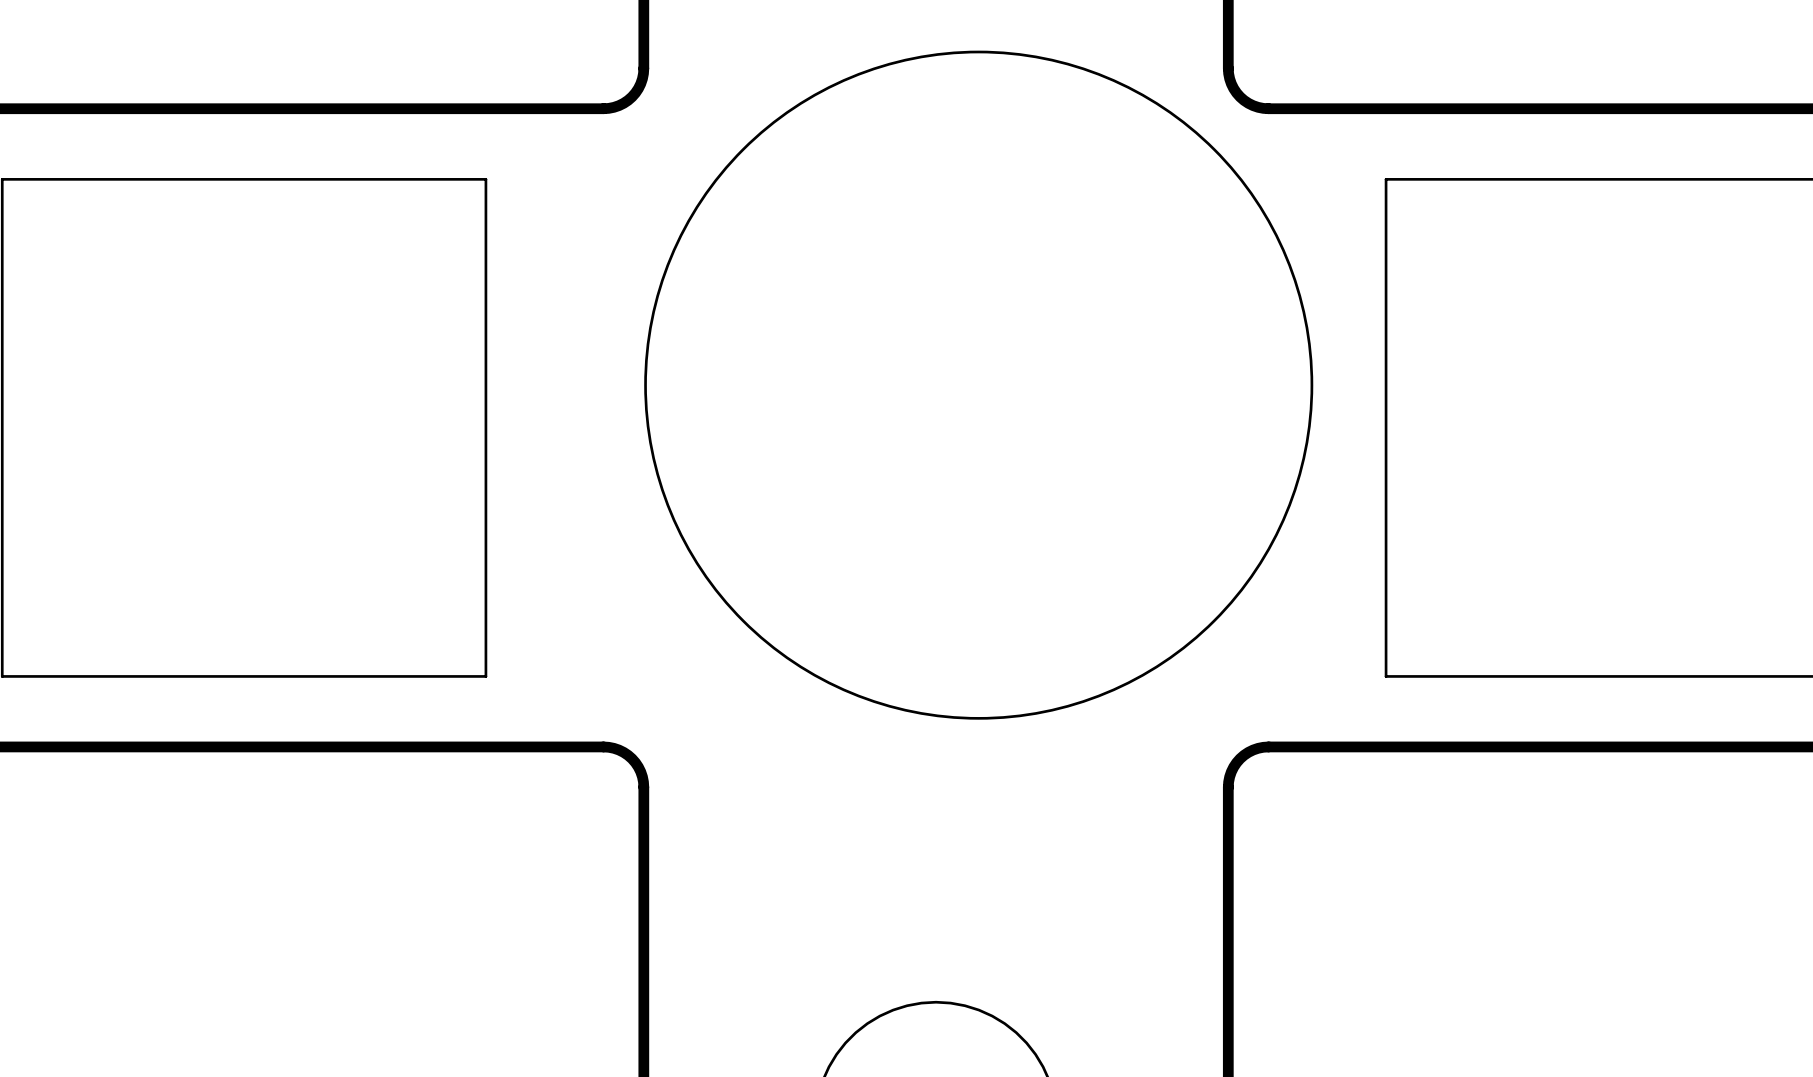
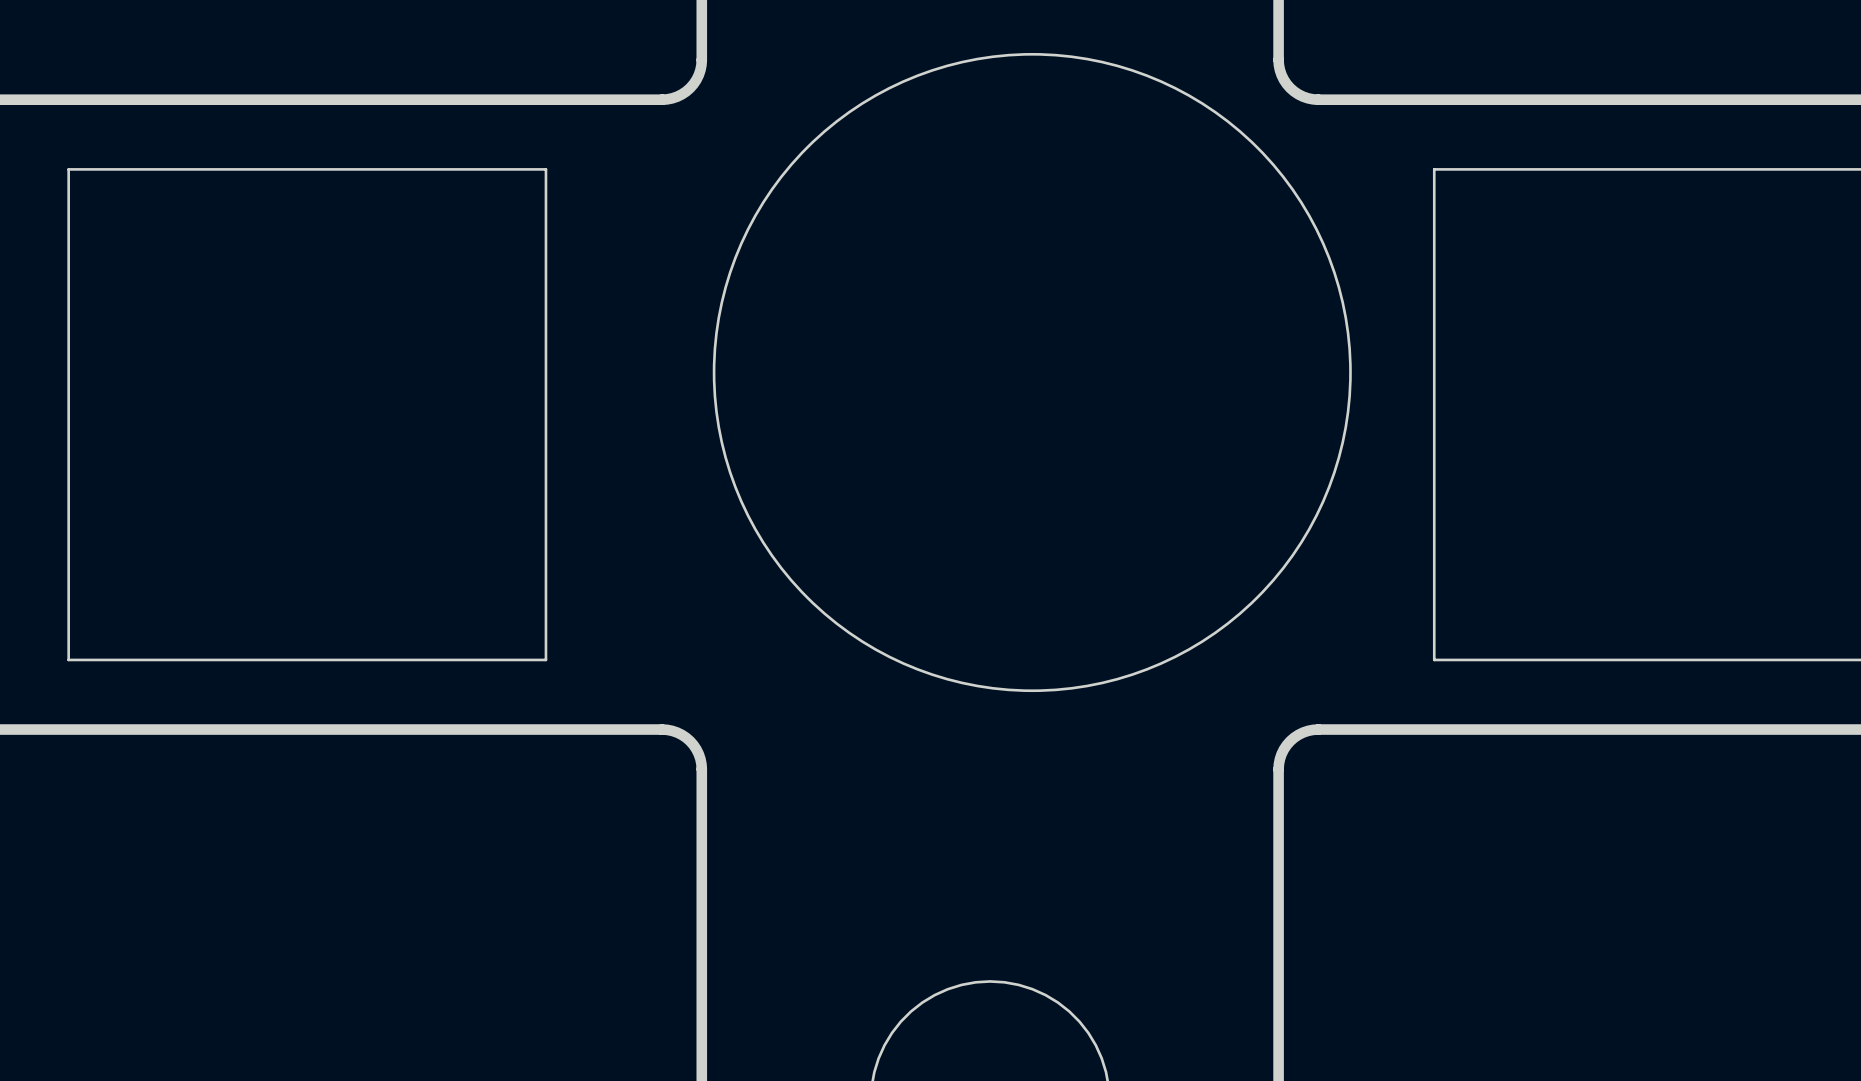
round board edge size: [644, 50, 1314, 720] -> [712, 52, 1352, 693]

